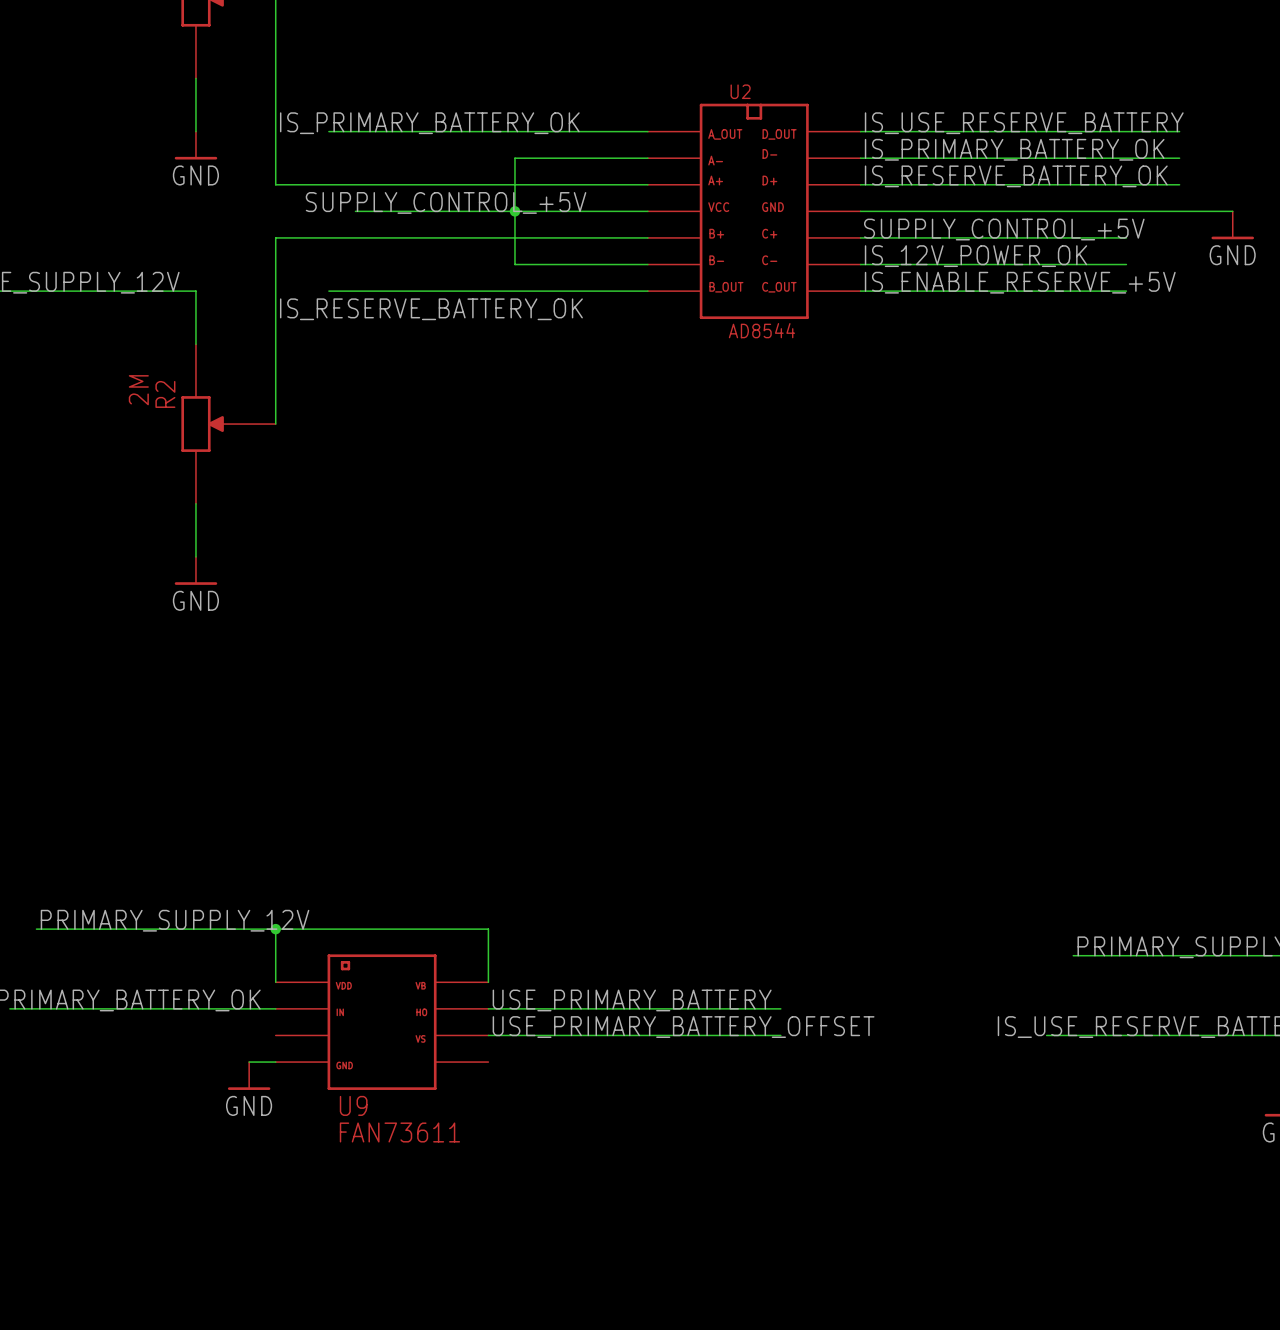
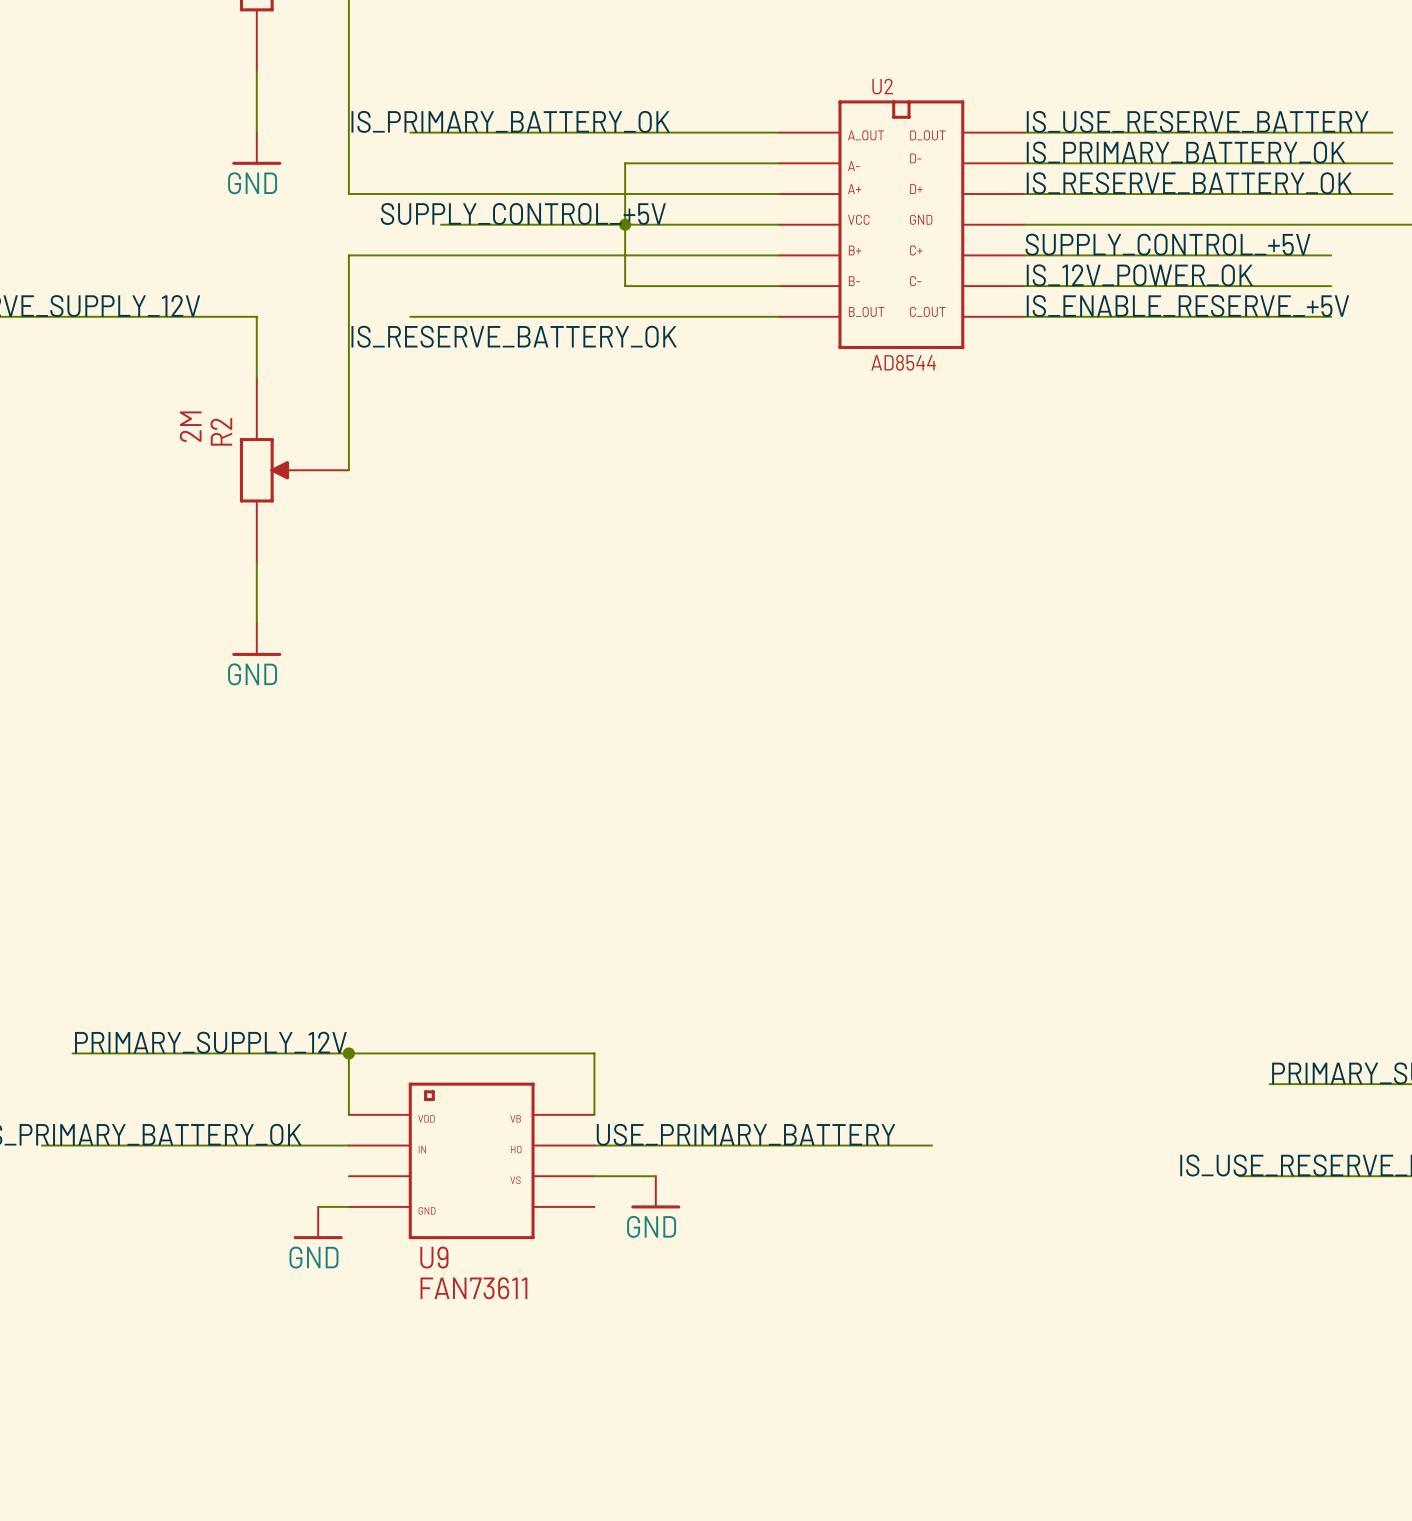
label: USE_PRIMARY_BATTERY_OFFSET (683, 1027) -> none
wire: (541, 1035) (780, 1035) -> none
power symbol: none -> GND (655, 1192)

